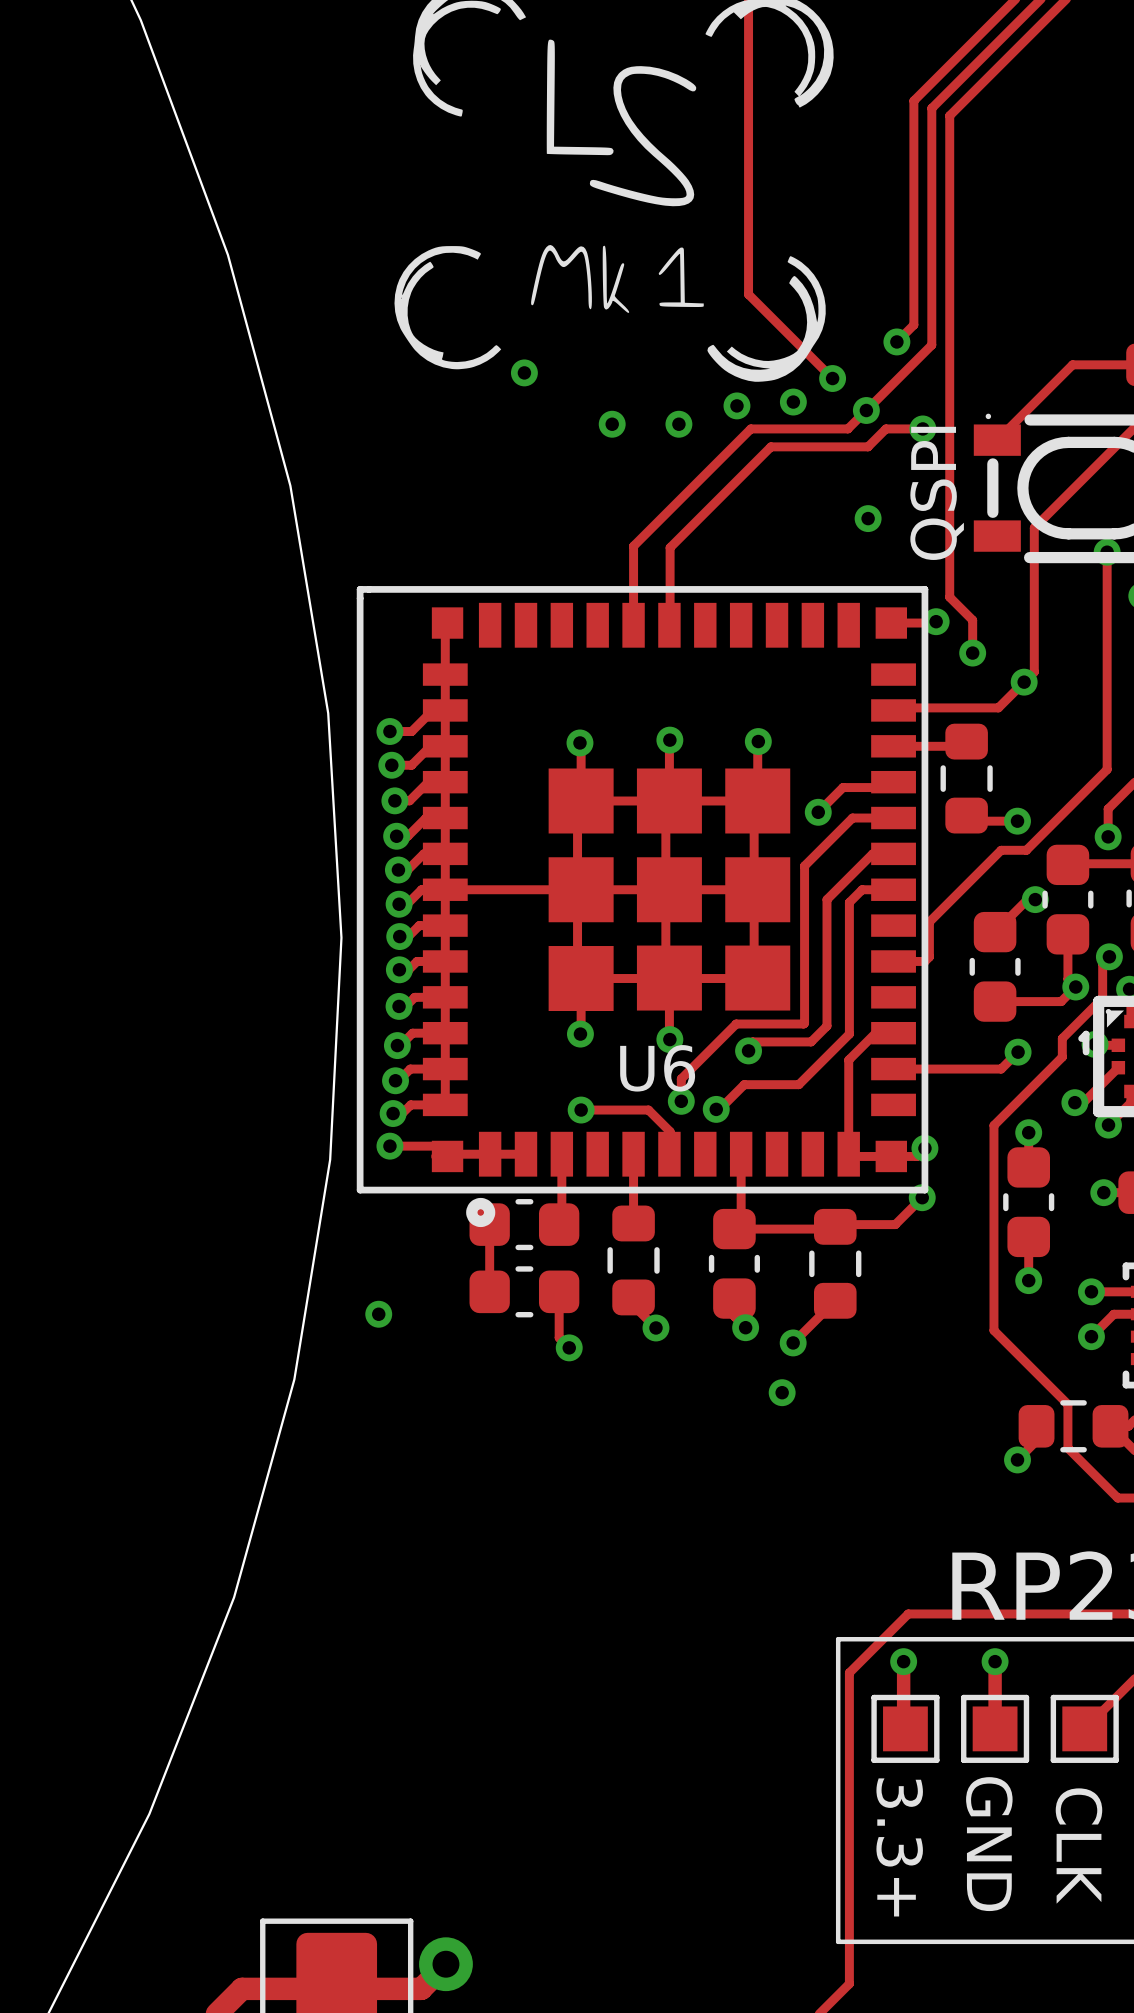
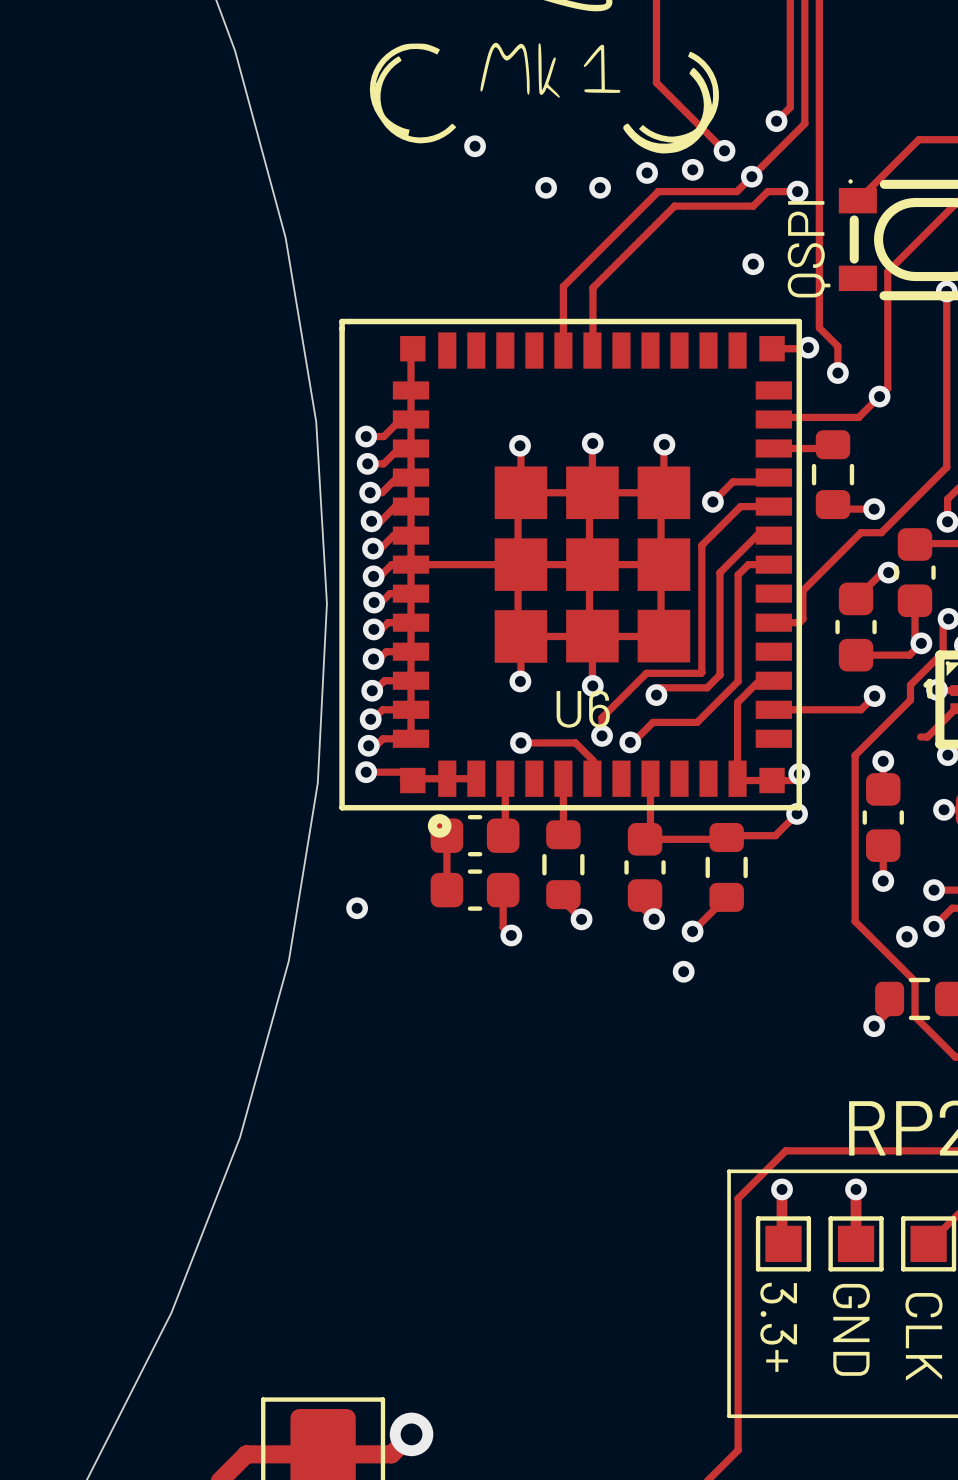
via: (1074, 1102) -> none
via: none -> (906, 936)

